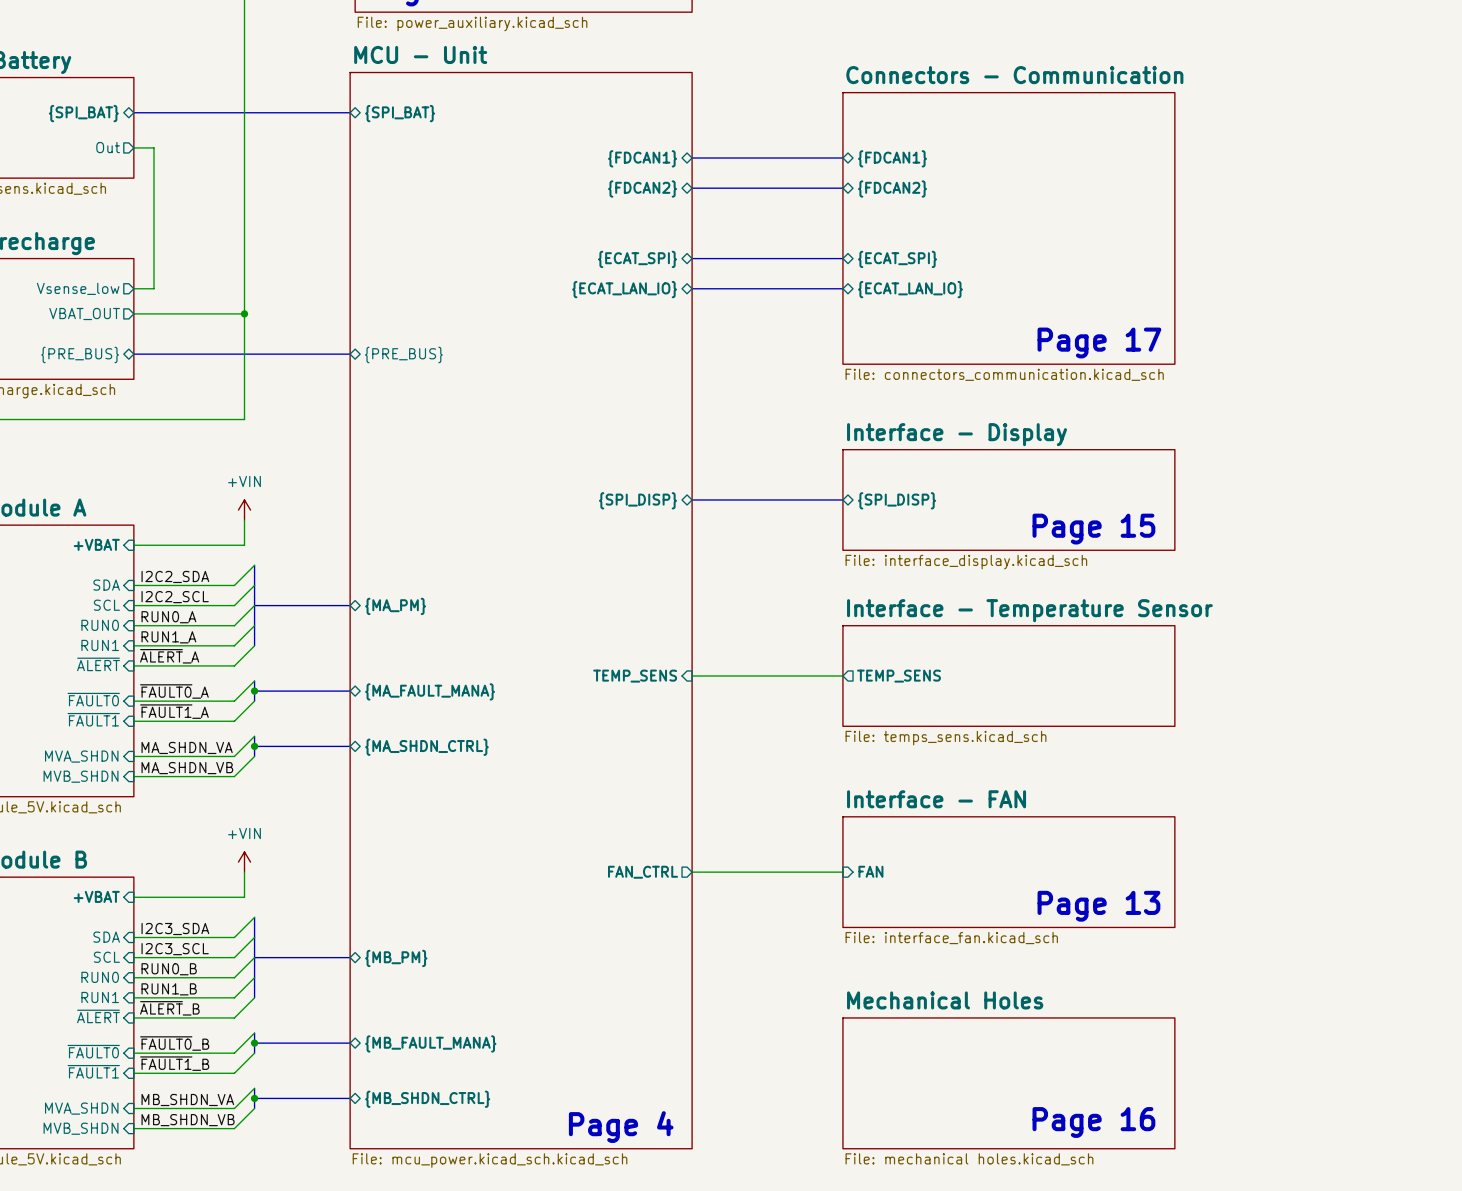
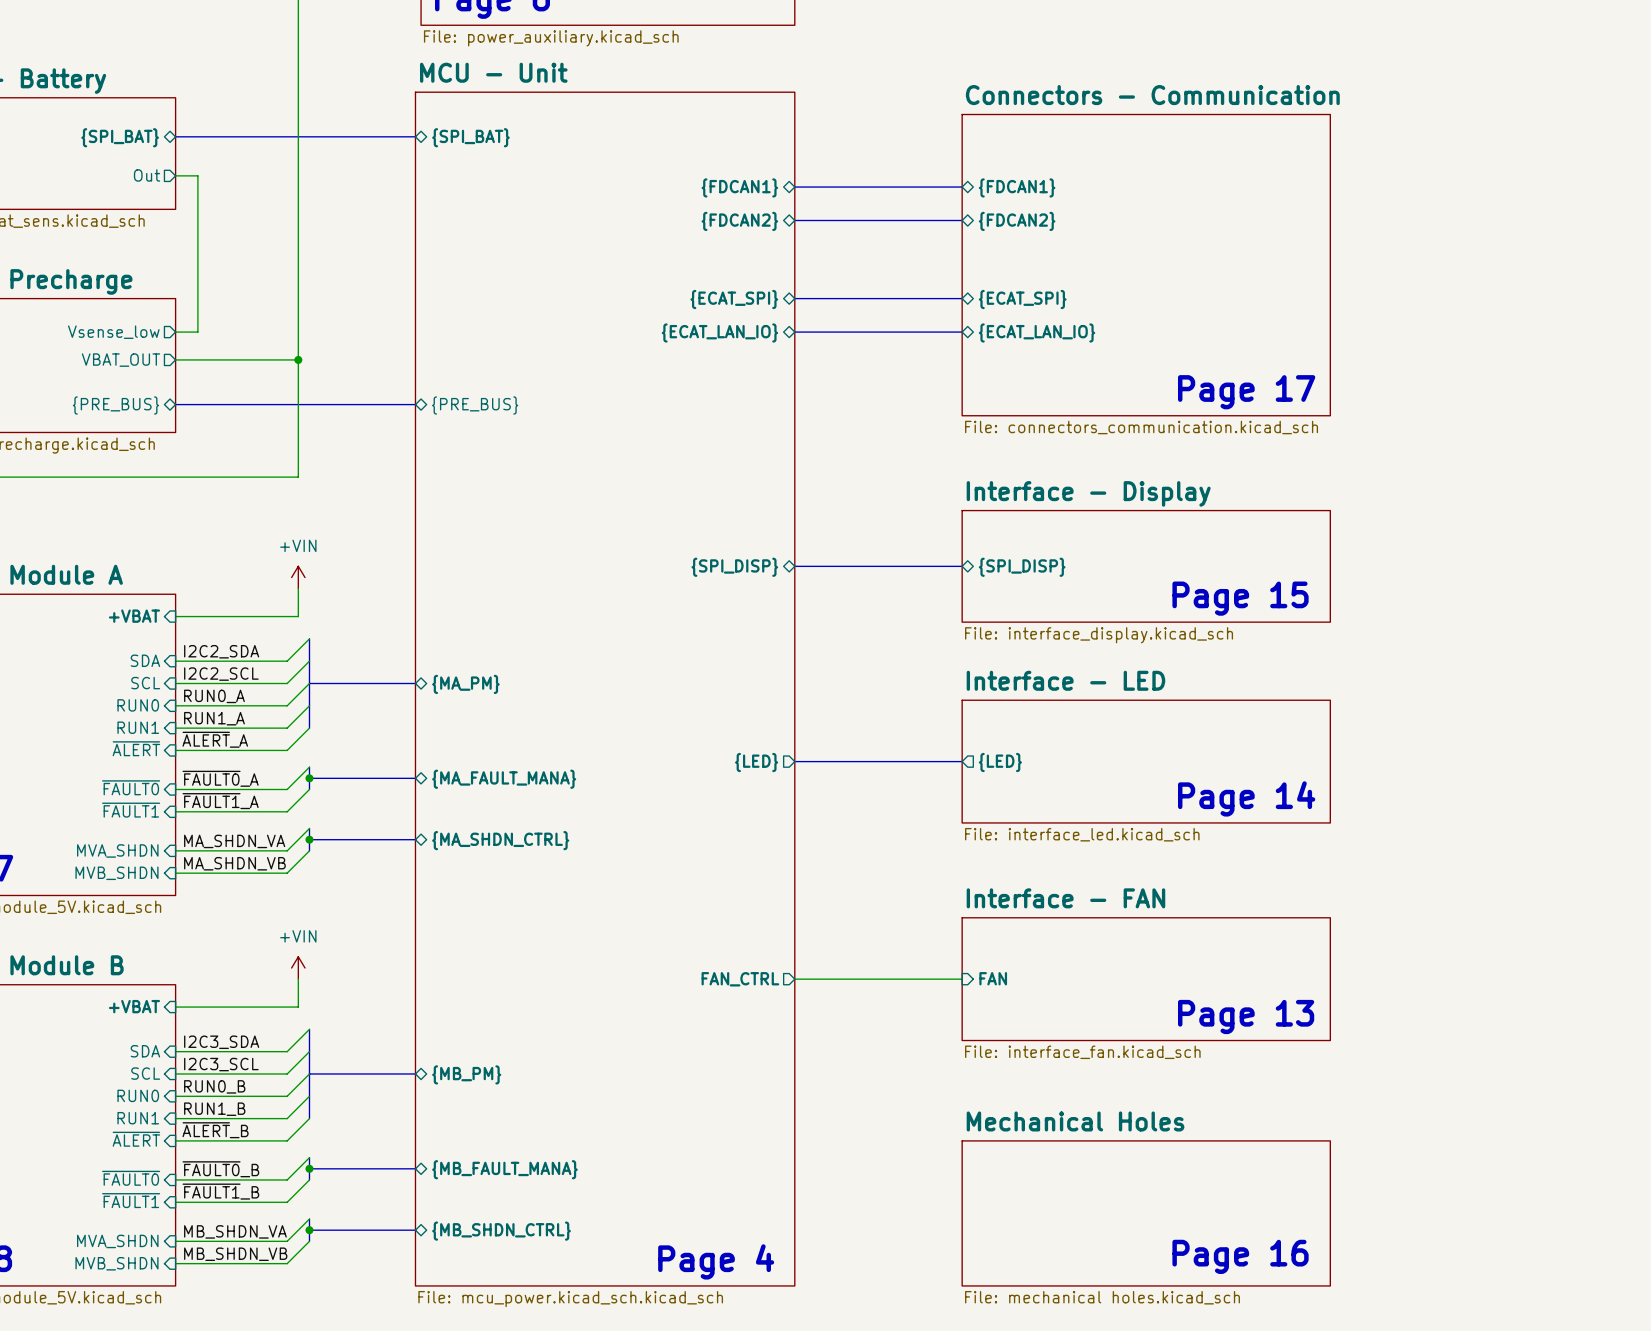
sheet pin shape: input (635, 676) -> output (756, 762)
sheet pin: TEMP_SENS (635, 676) -> {LED} (756, 762)
bus: none -> (794, 761) (962, 761)
sheet pin: TEMP_SENS (898, 676) -> {LED} (1000, 762)
sheet Interface - Temperature Sensor: File: temps_sens.kicad_sch (1008, 676) -> none
sheet Interface - LED: none -> File: interface_led.kicad_sch (1146, 761)
text: none -> Page 14 (1246, 798)

